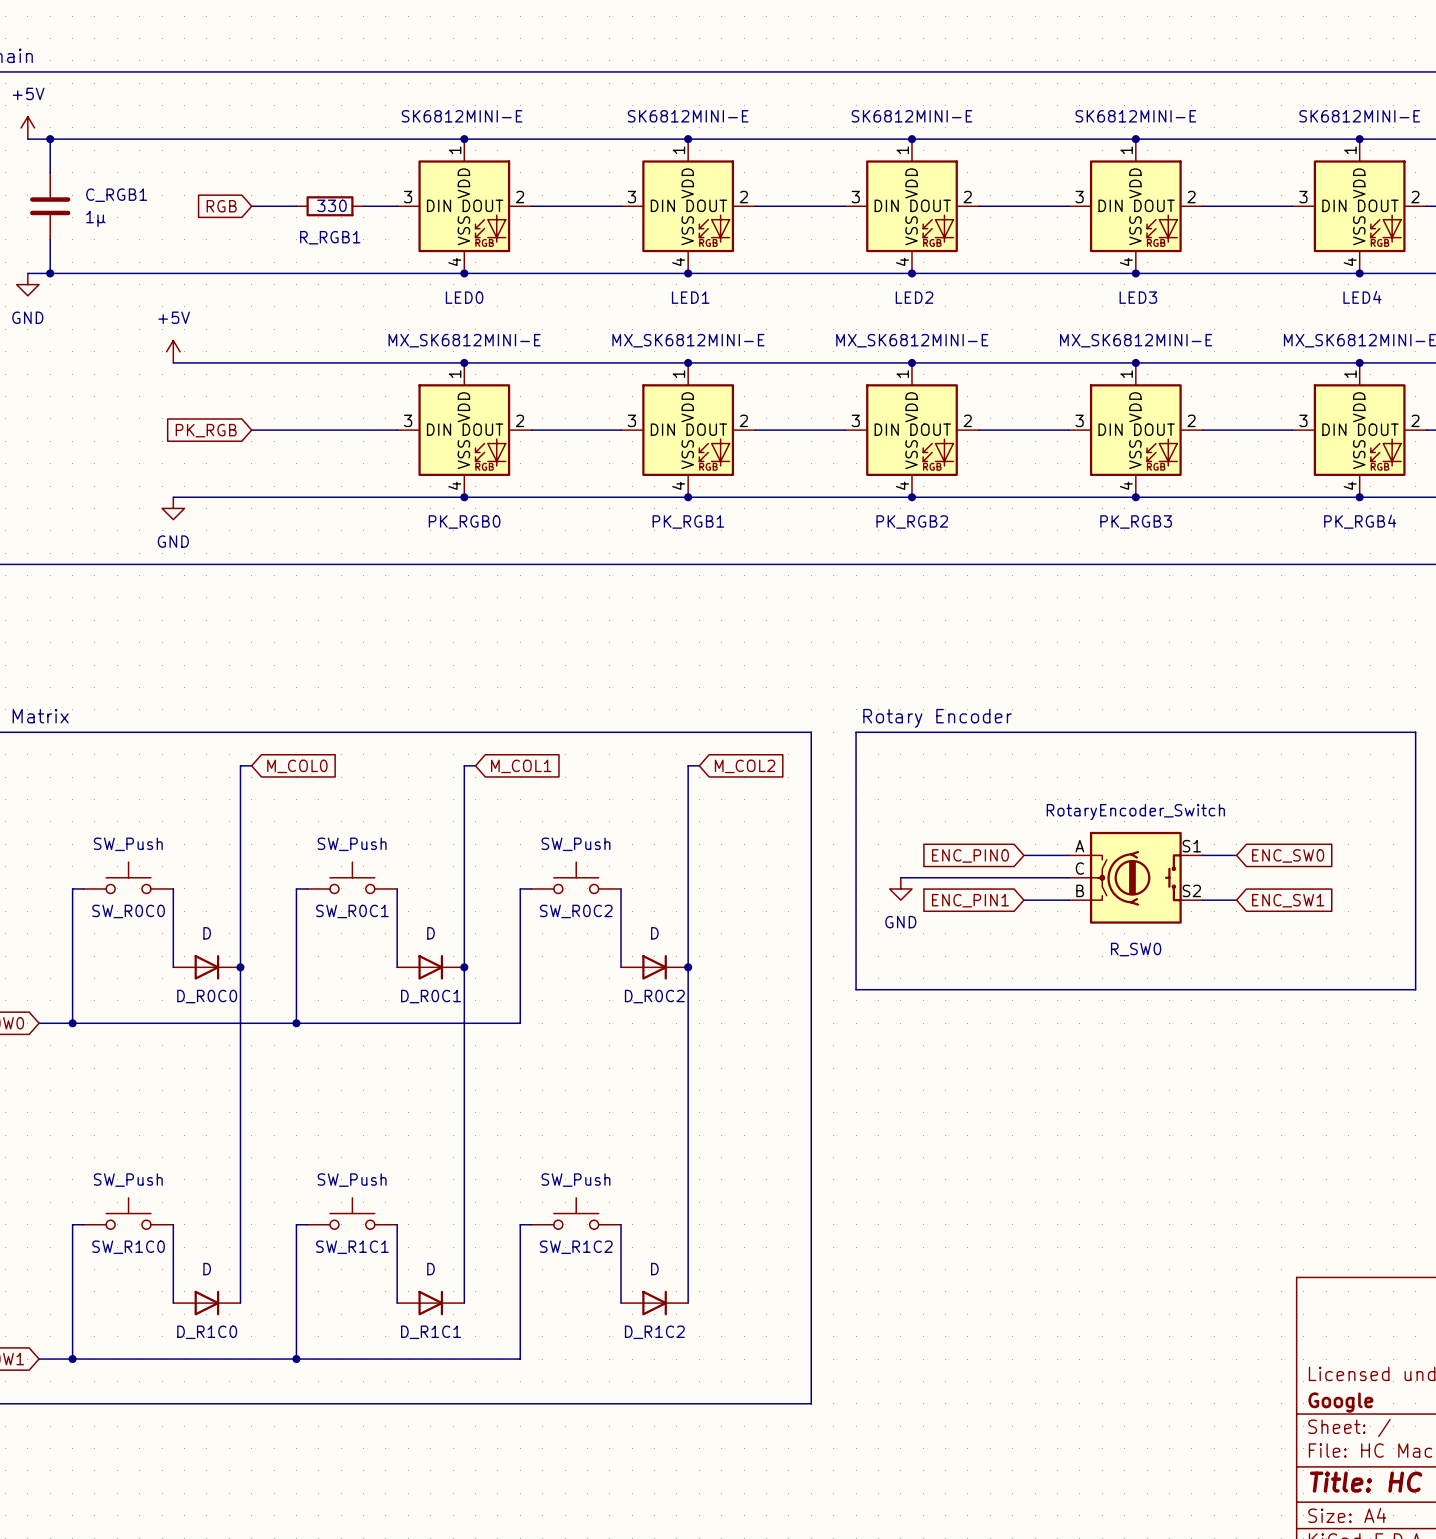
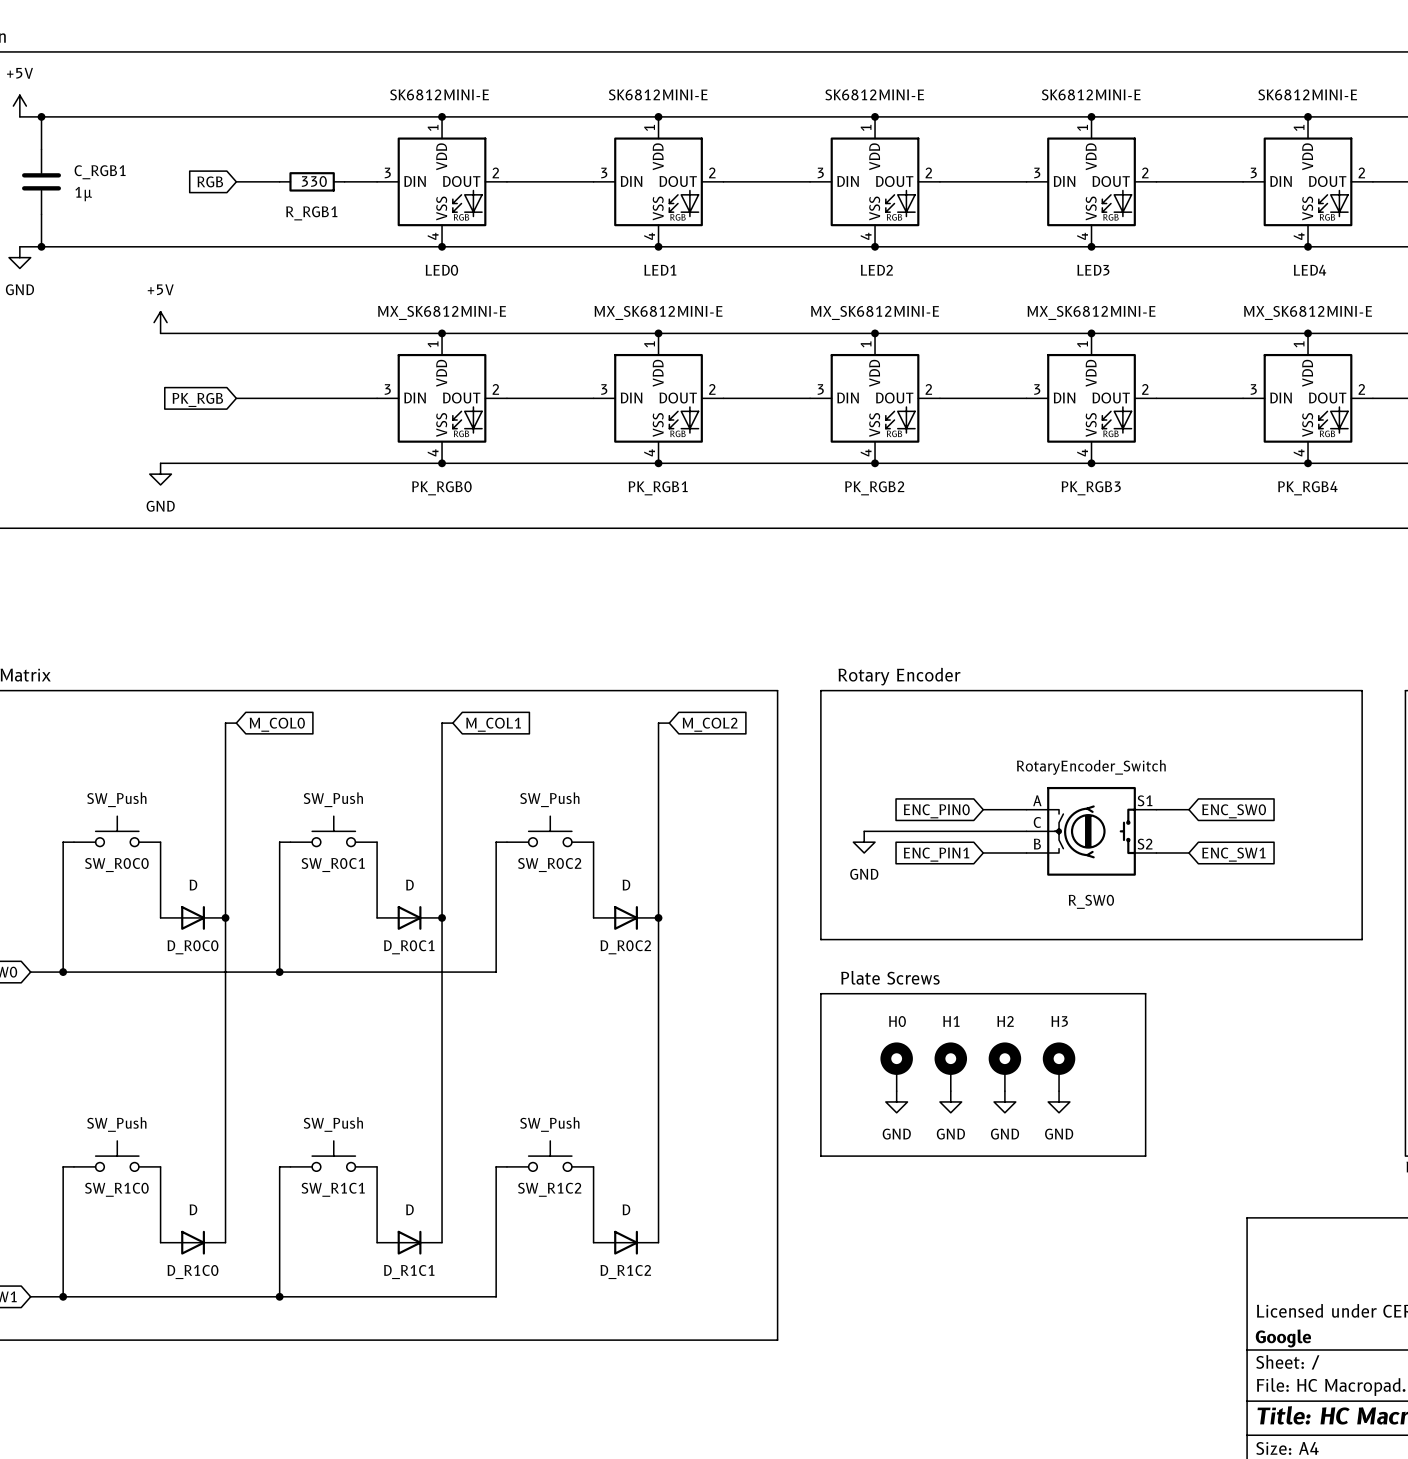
text: none -> Plate Screws (890, 977)
line: none -> (820, 993) (1145, 993) (1145, 1156) (820, 1156) (820, 993)
H0: none -> (896, 1066)
H1: none -> (950, 1066)
H2: none -> (1004, 1066)
H3: none -> (1059, 1066)
power symbol: none -> GND (896, 1101)
power symbol: none -> GND (950, 1101)
power symbol: none -> GND (1004, 1101)
power symbol: none -> GND (1059, 1101)

